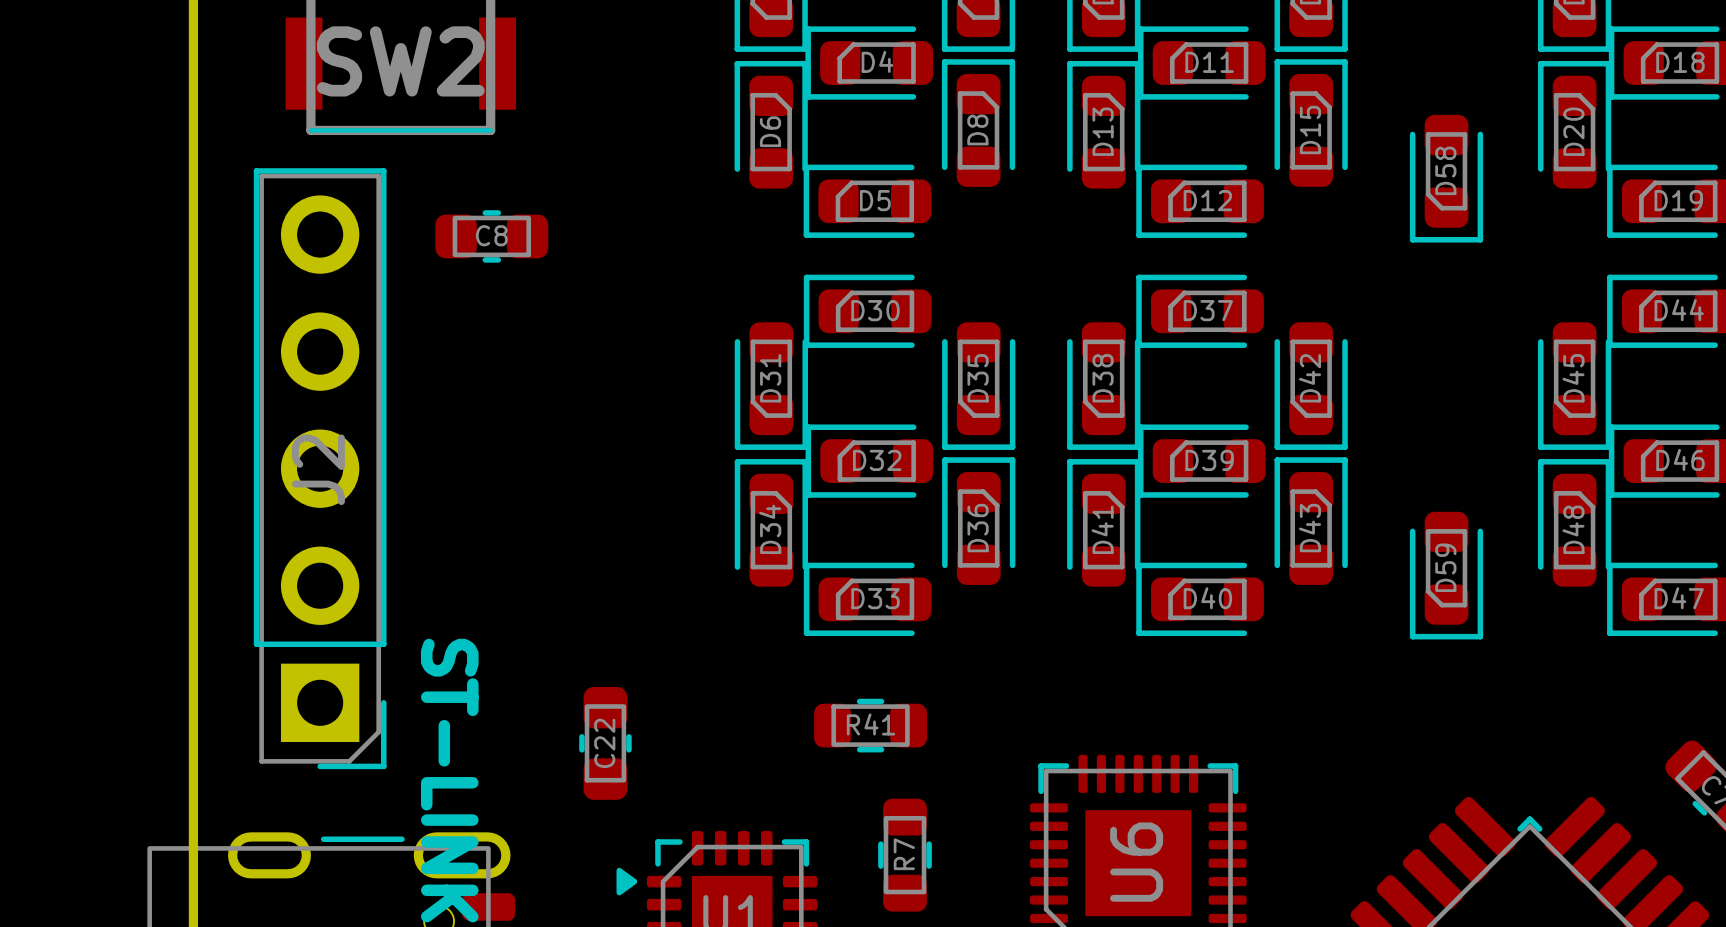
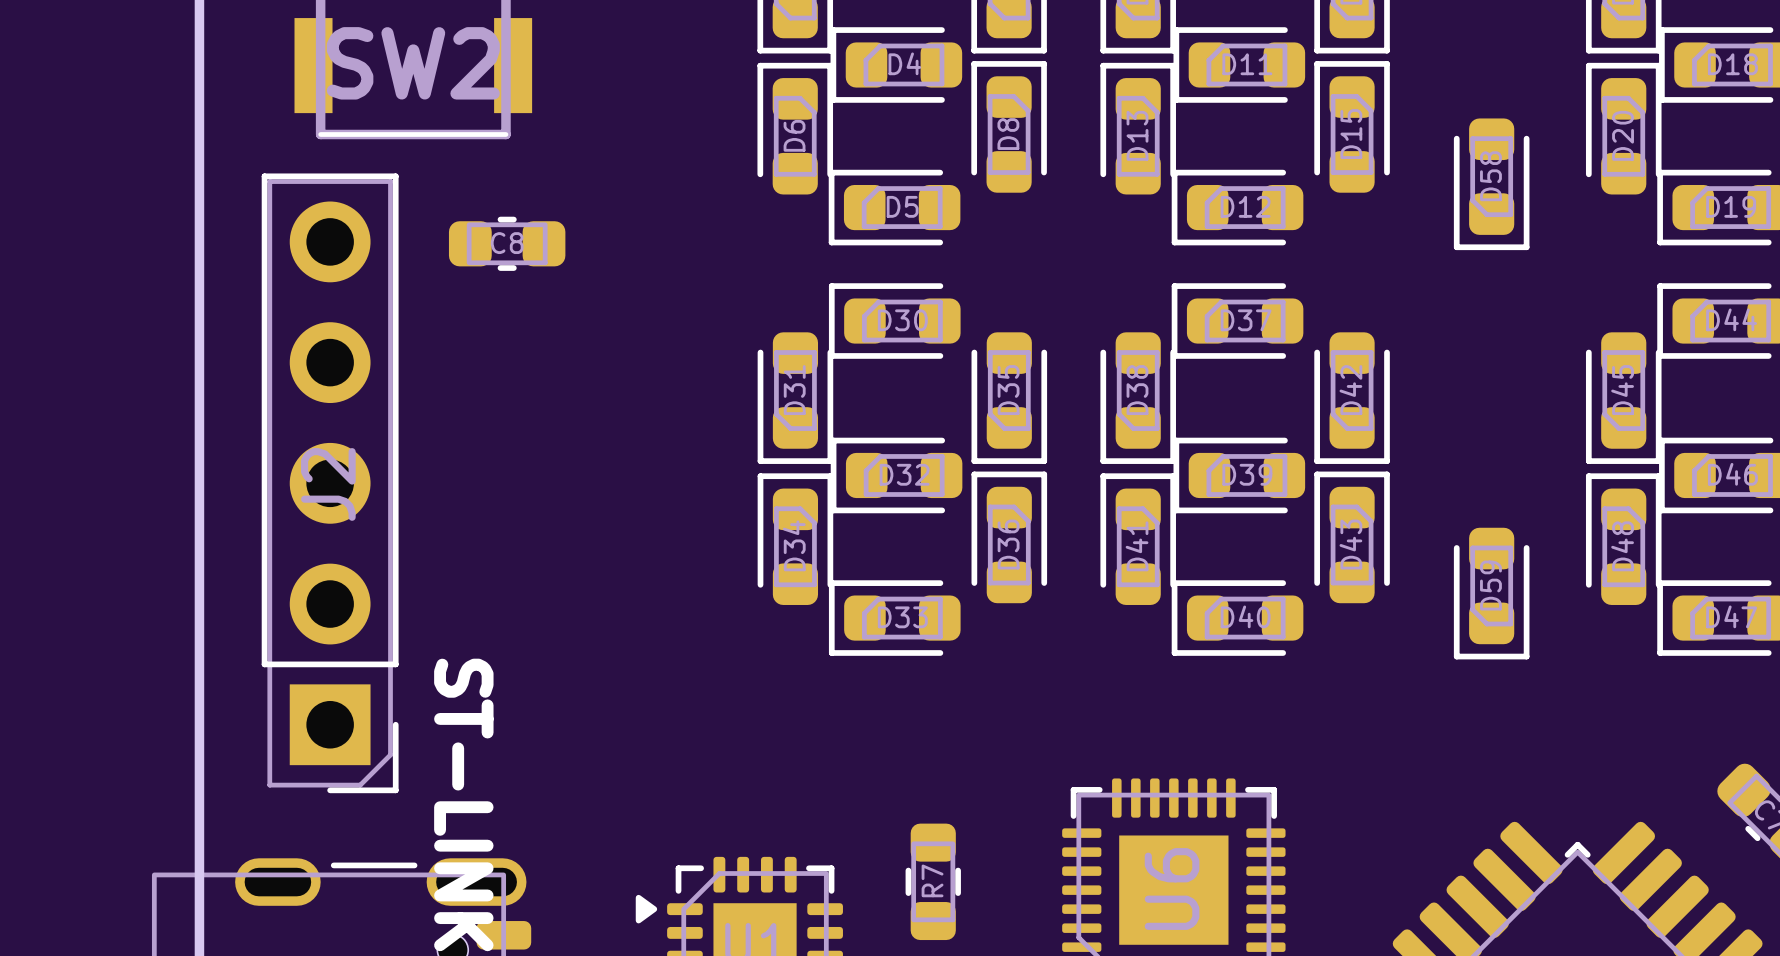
R41: (870, 725) -> none
C22: (605, 743) -> none

